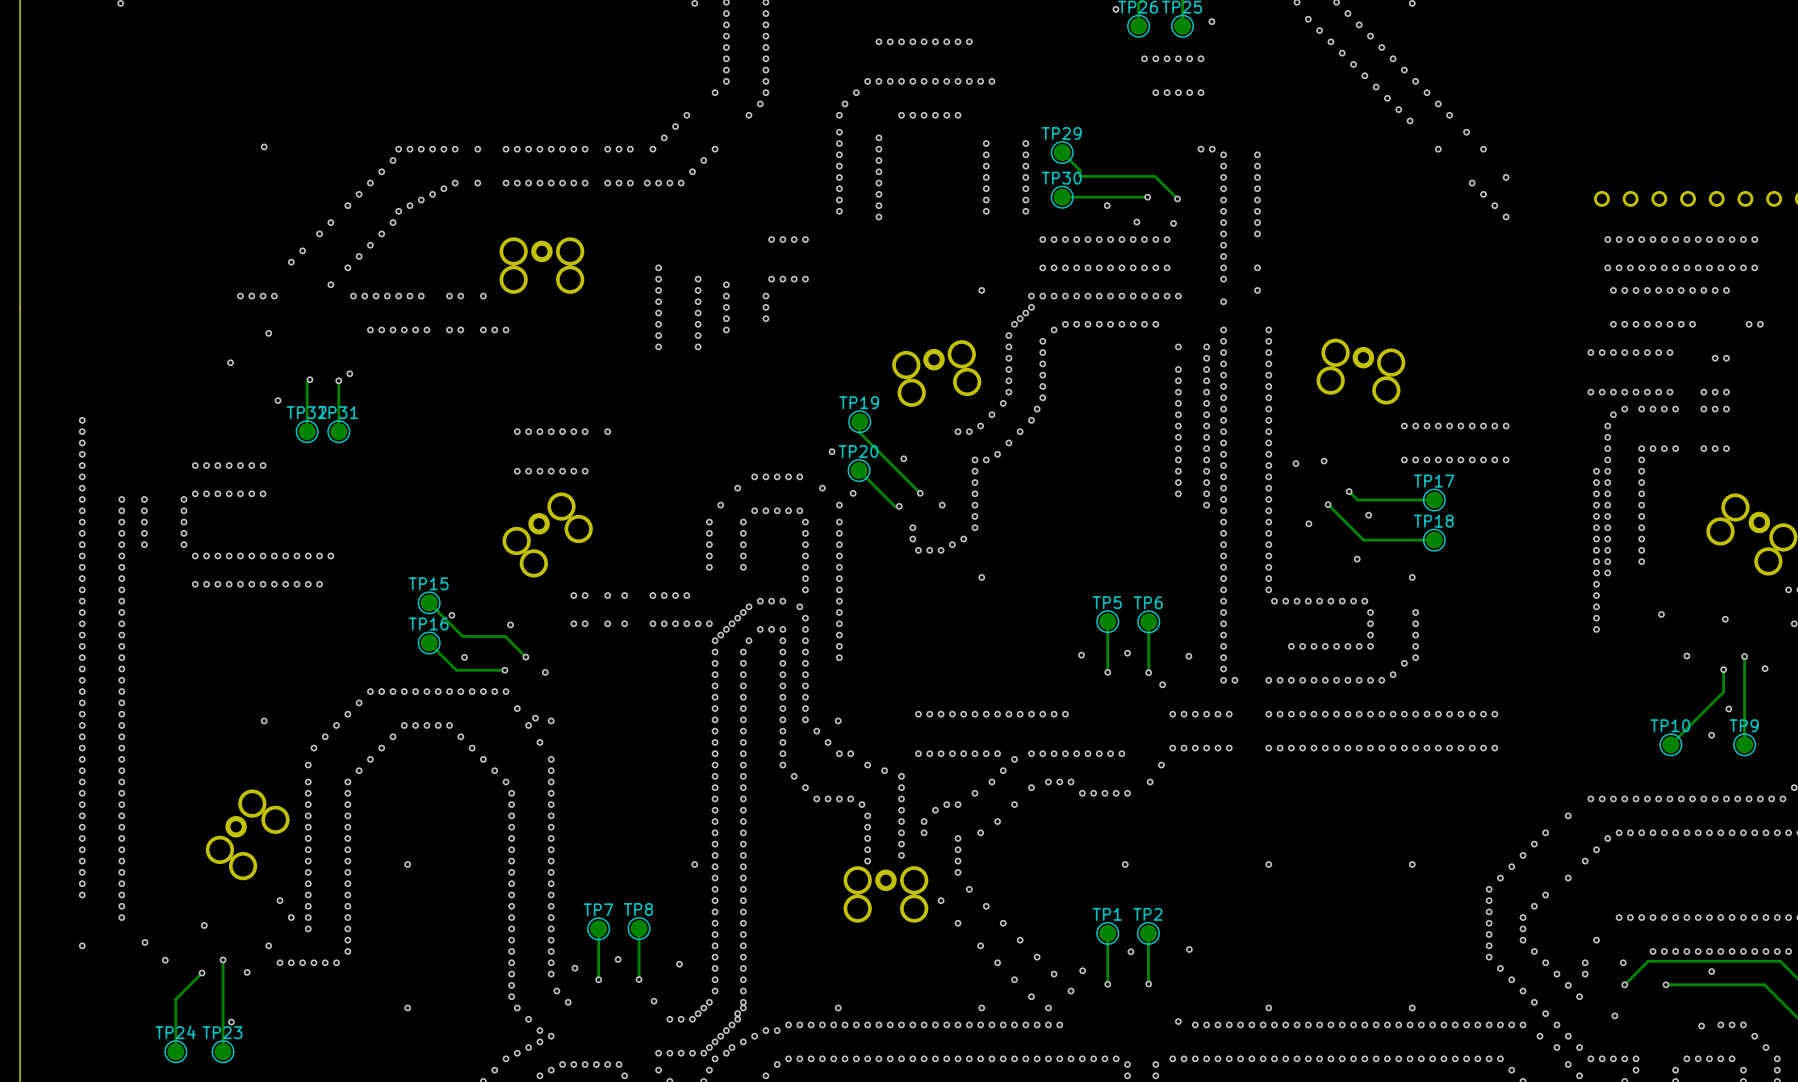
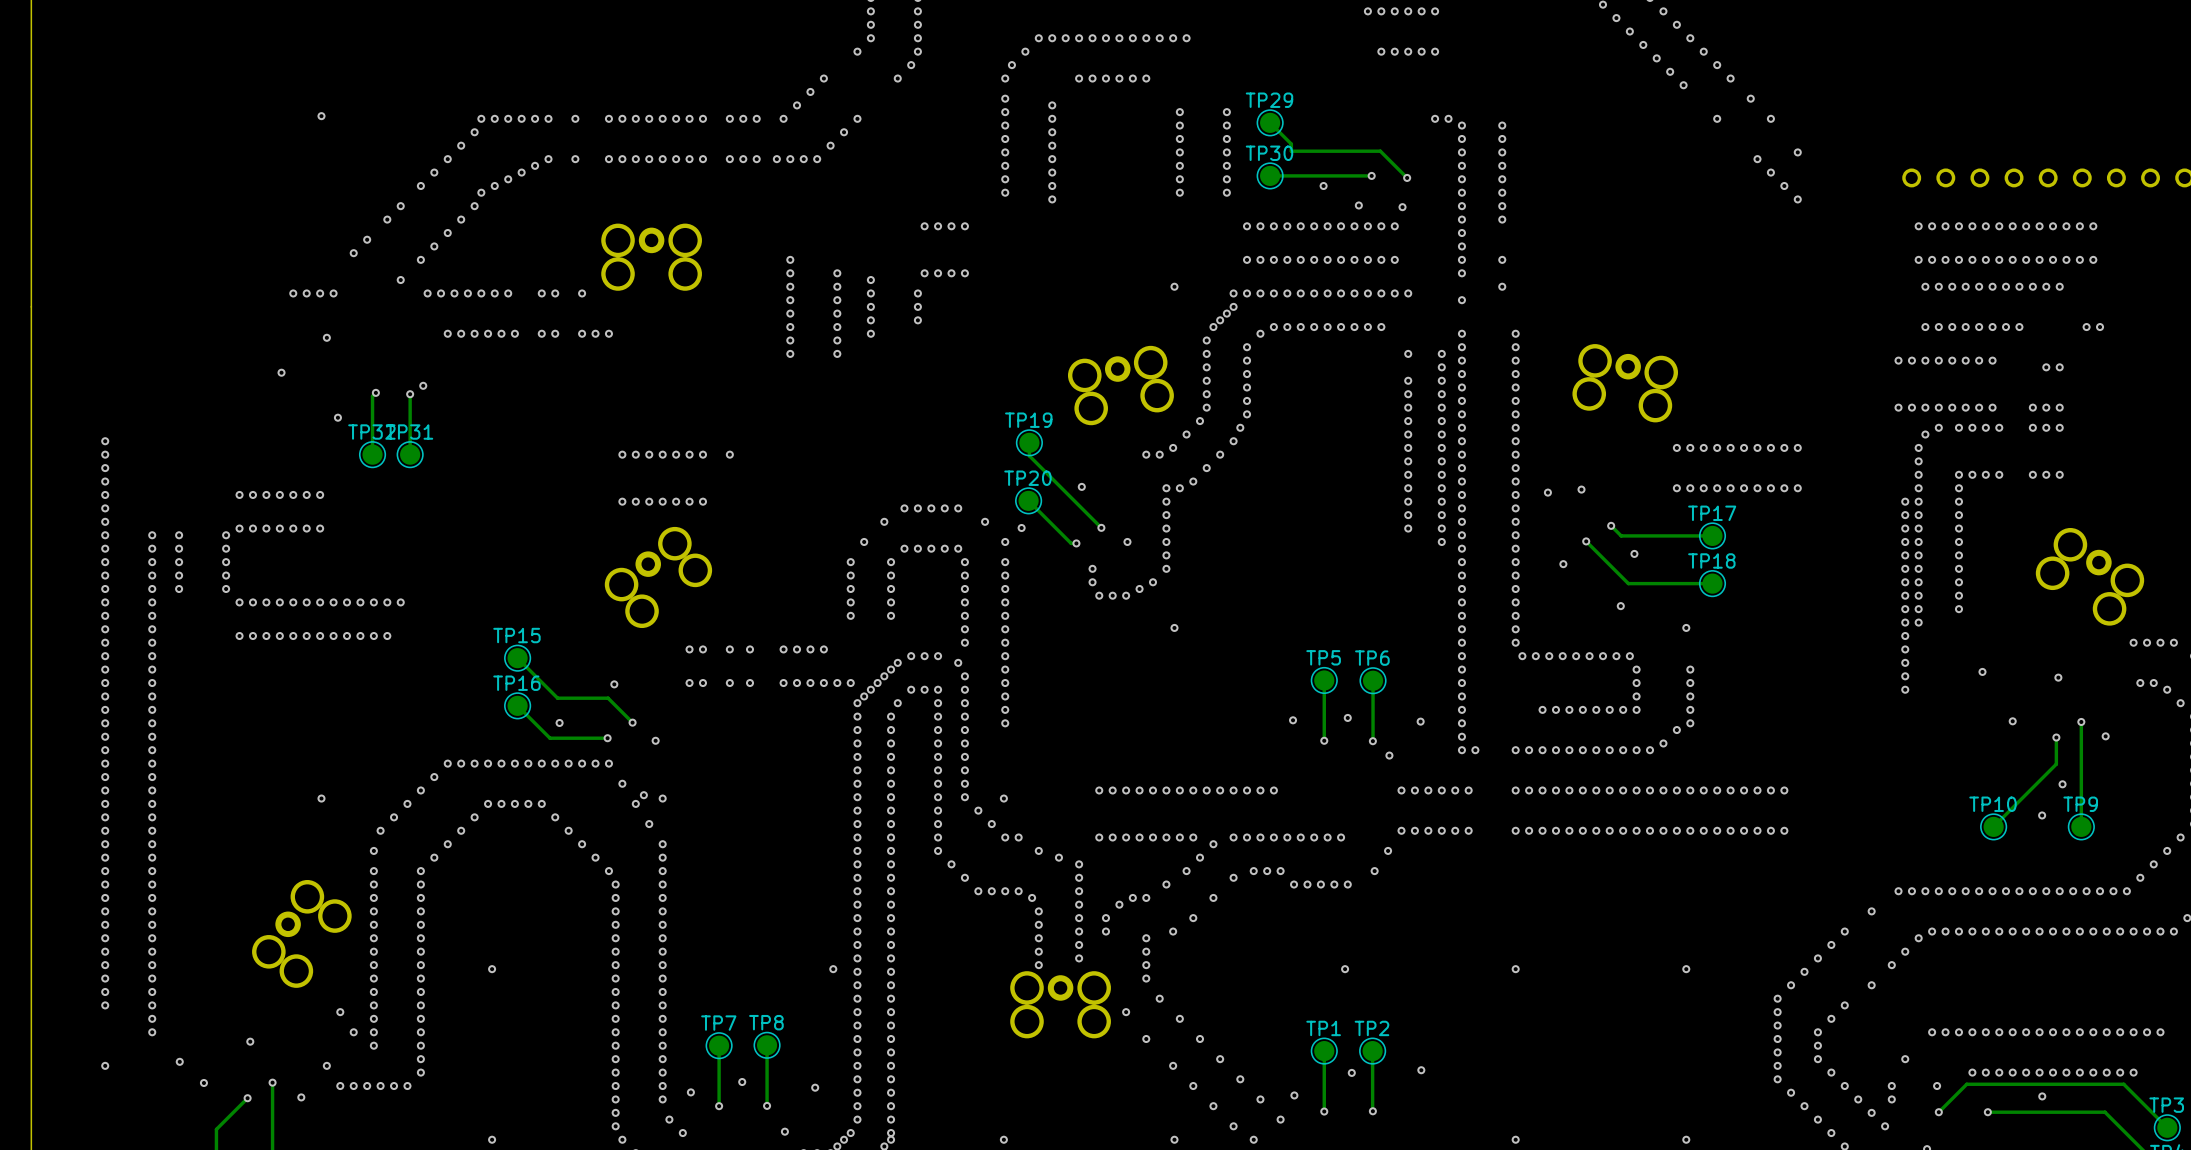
via: (832, 451) -> none
via: (451, 615) -> none

